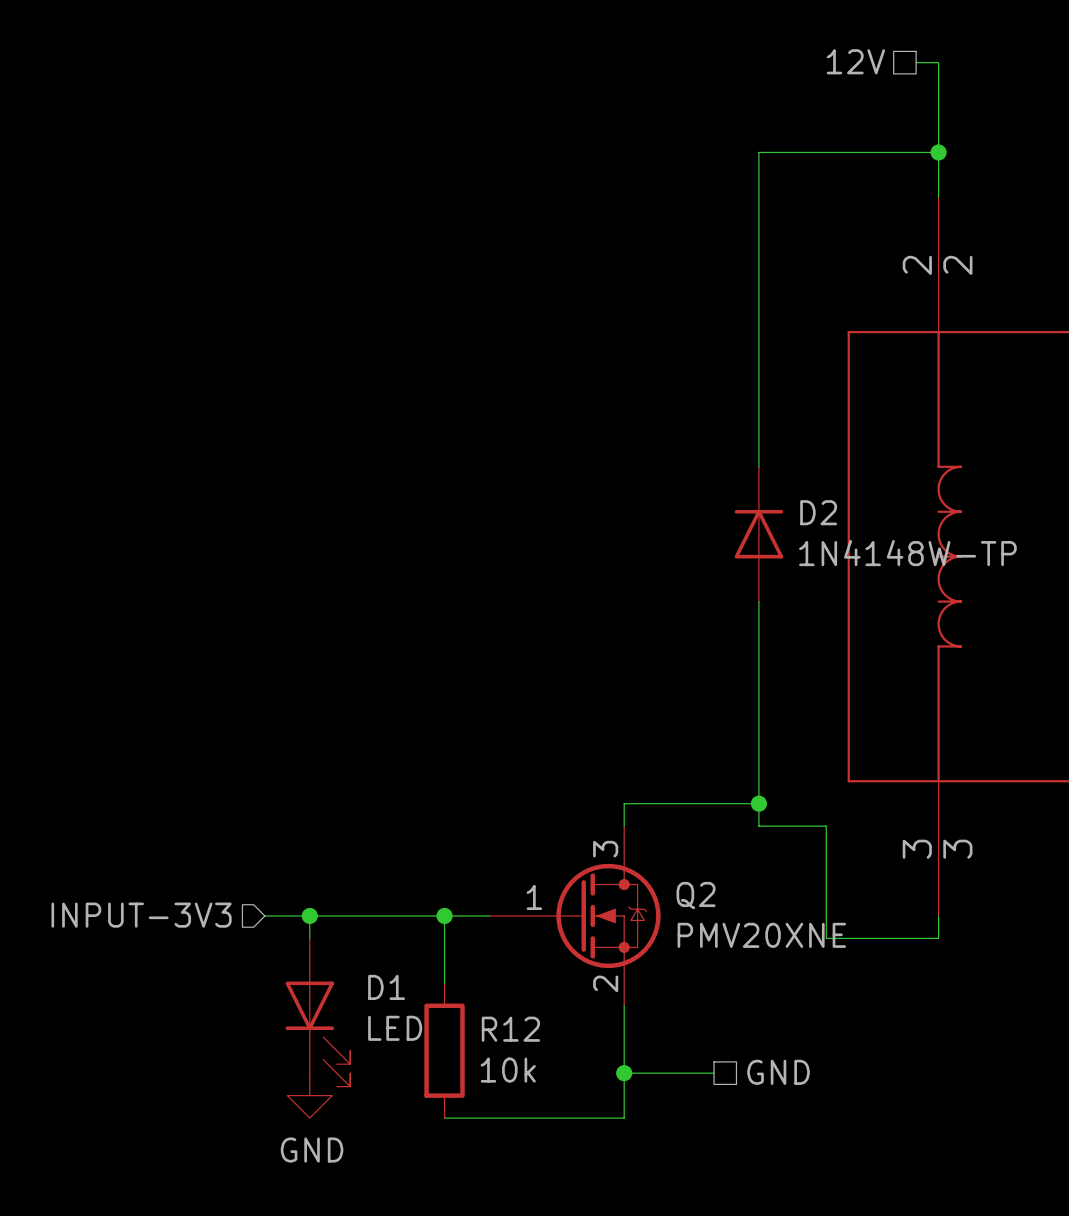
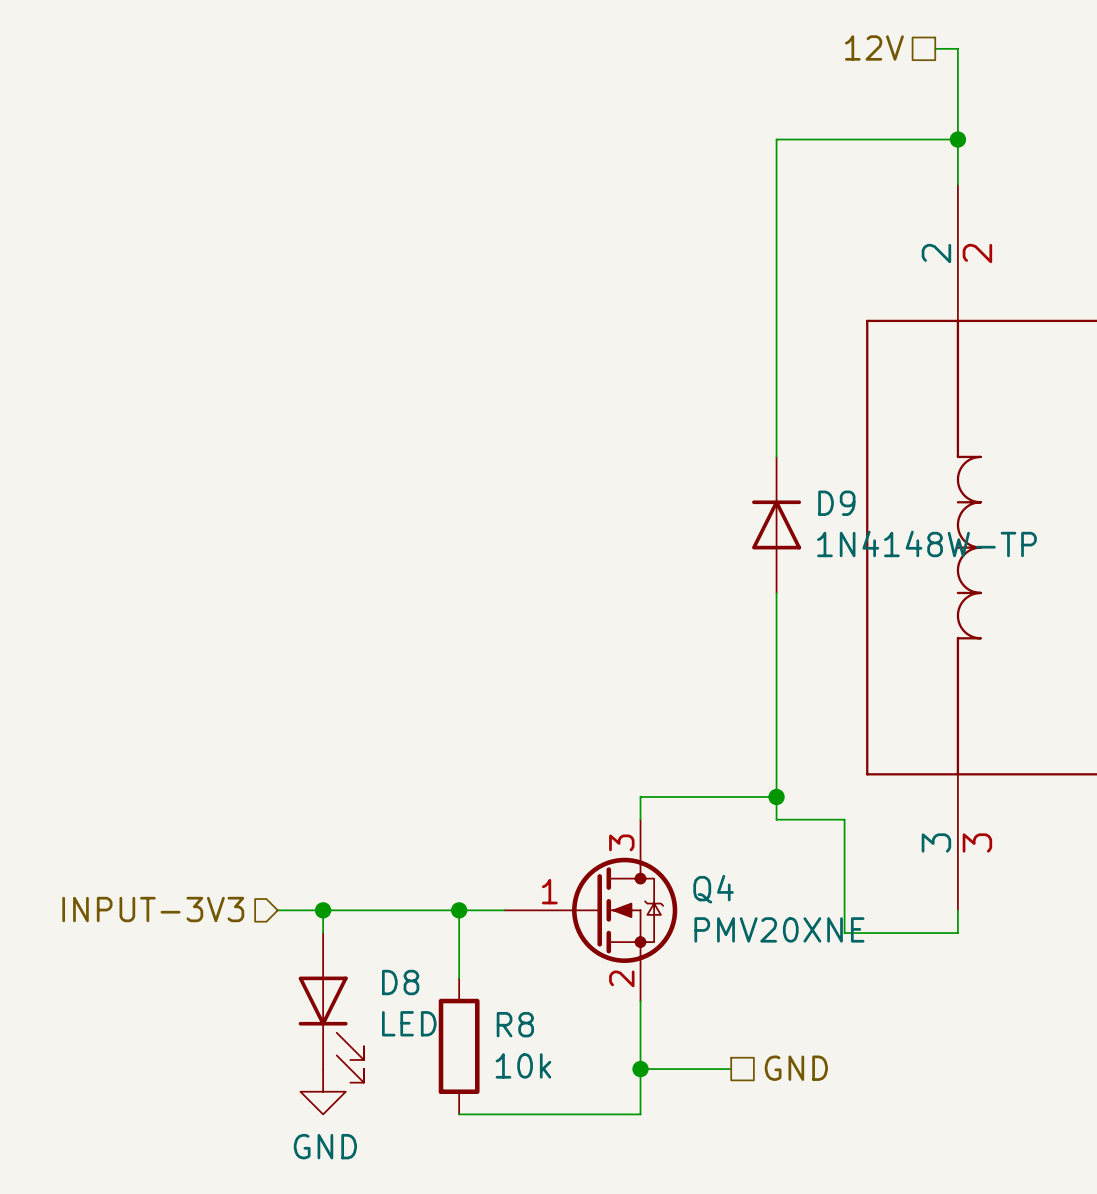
D2 name: D2 (818, 512) -> D9 (836, 503)
Q2 name: Q2 (696, 895) -> Q4 (713, 889)
D1 name: D1 (386, 987) -> D8 (400, 982)
R12 name: R12 (510, 1029) -> R8 (515, 1024)

